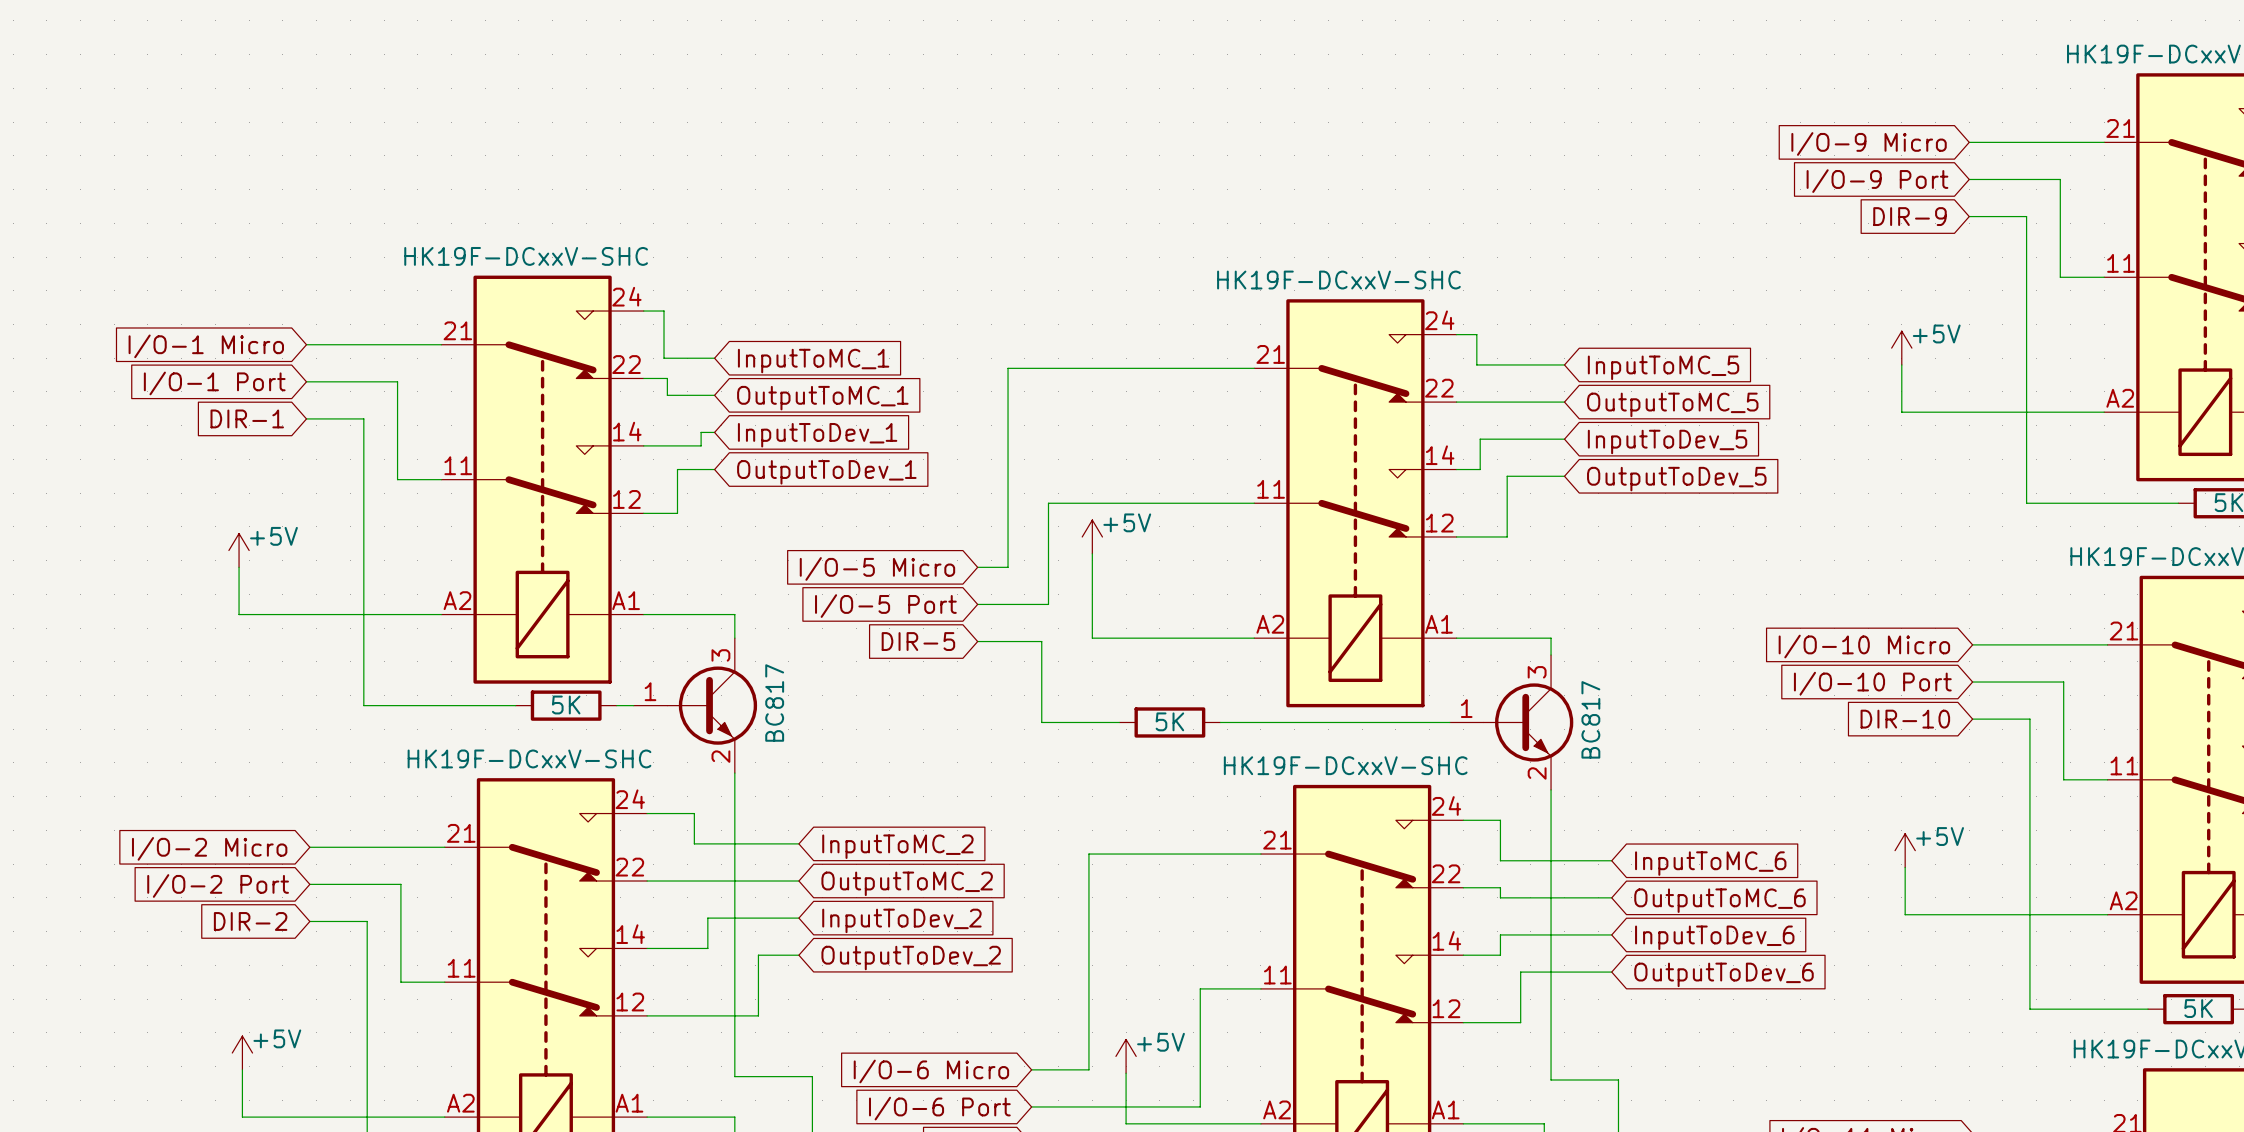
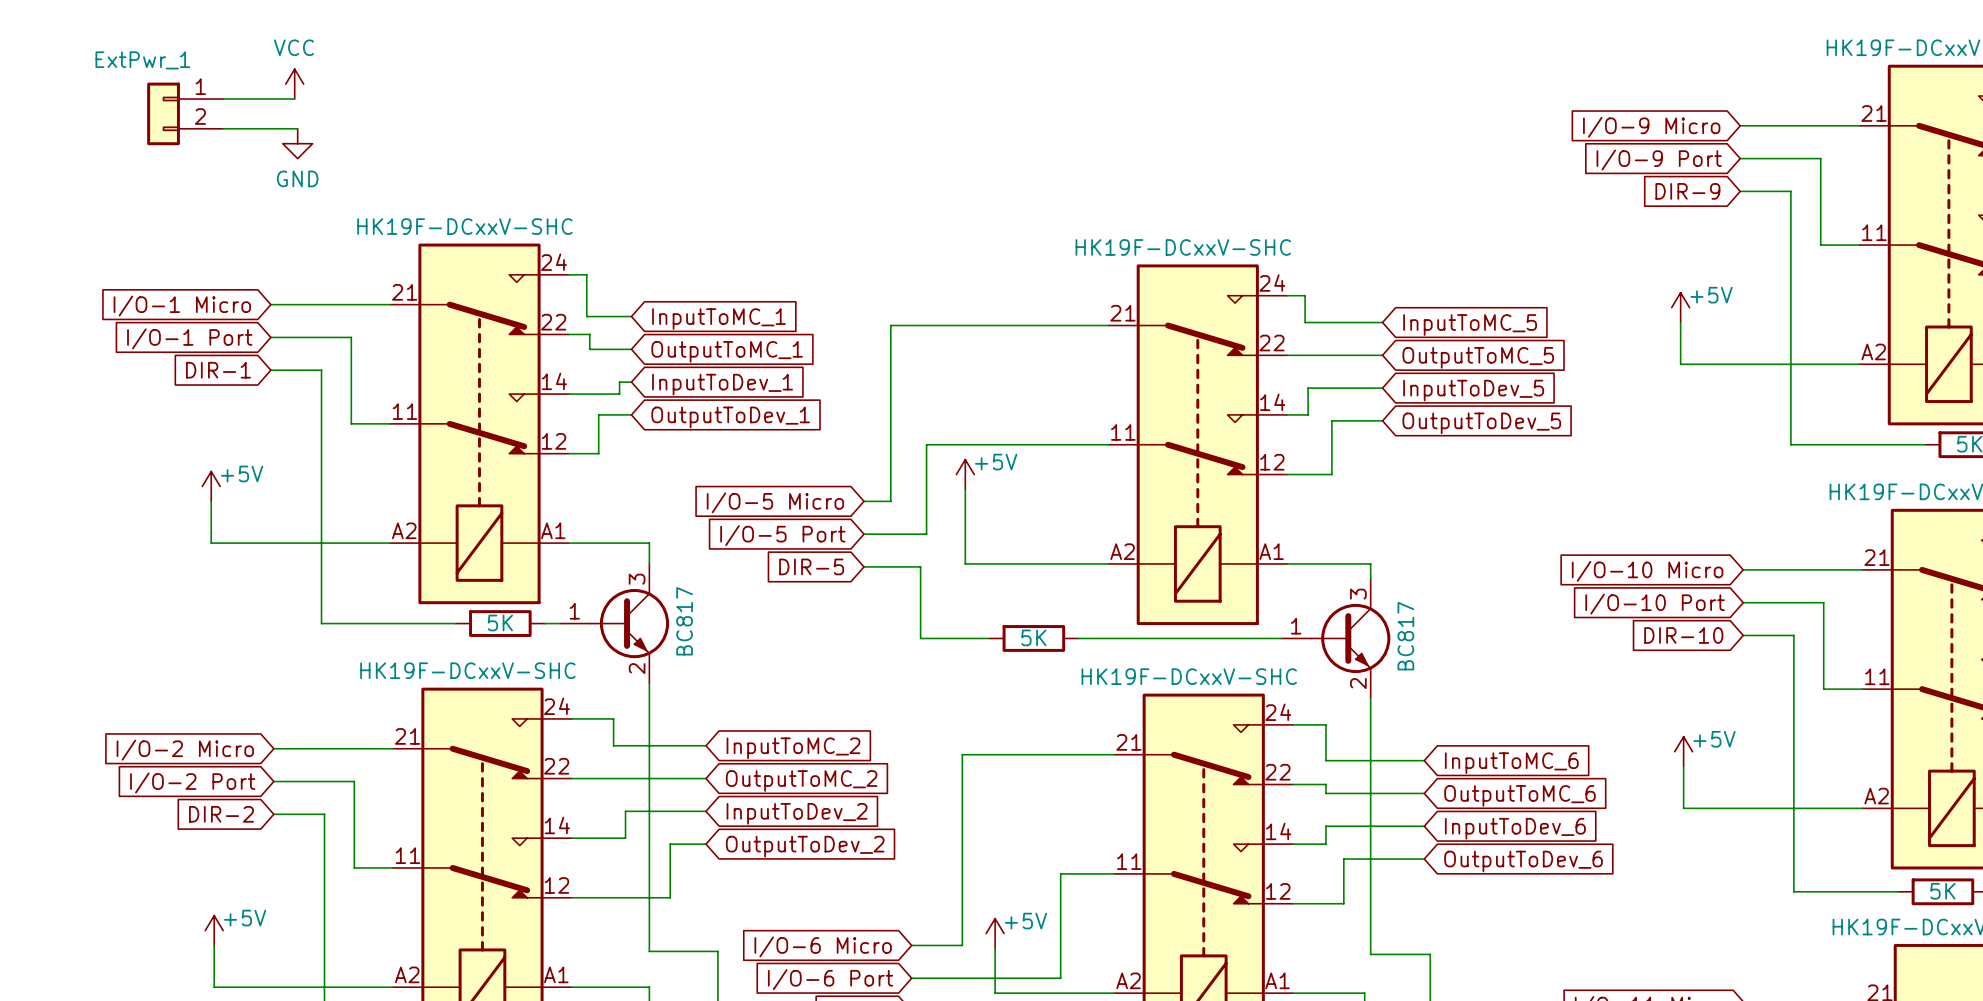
power symbol: none -> VCC (294, 84)
wire: none -> (223, 98) (294, 98)
ExtPwr_1: none -> (185, 113)
wire: none -> (223, 128) (297, 128)
power symbol: none -> GND (297, 143)

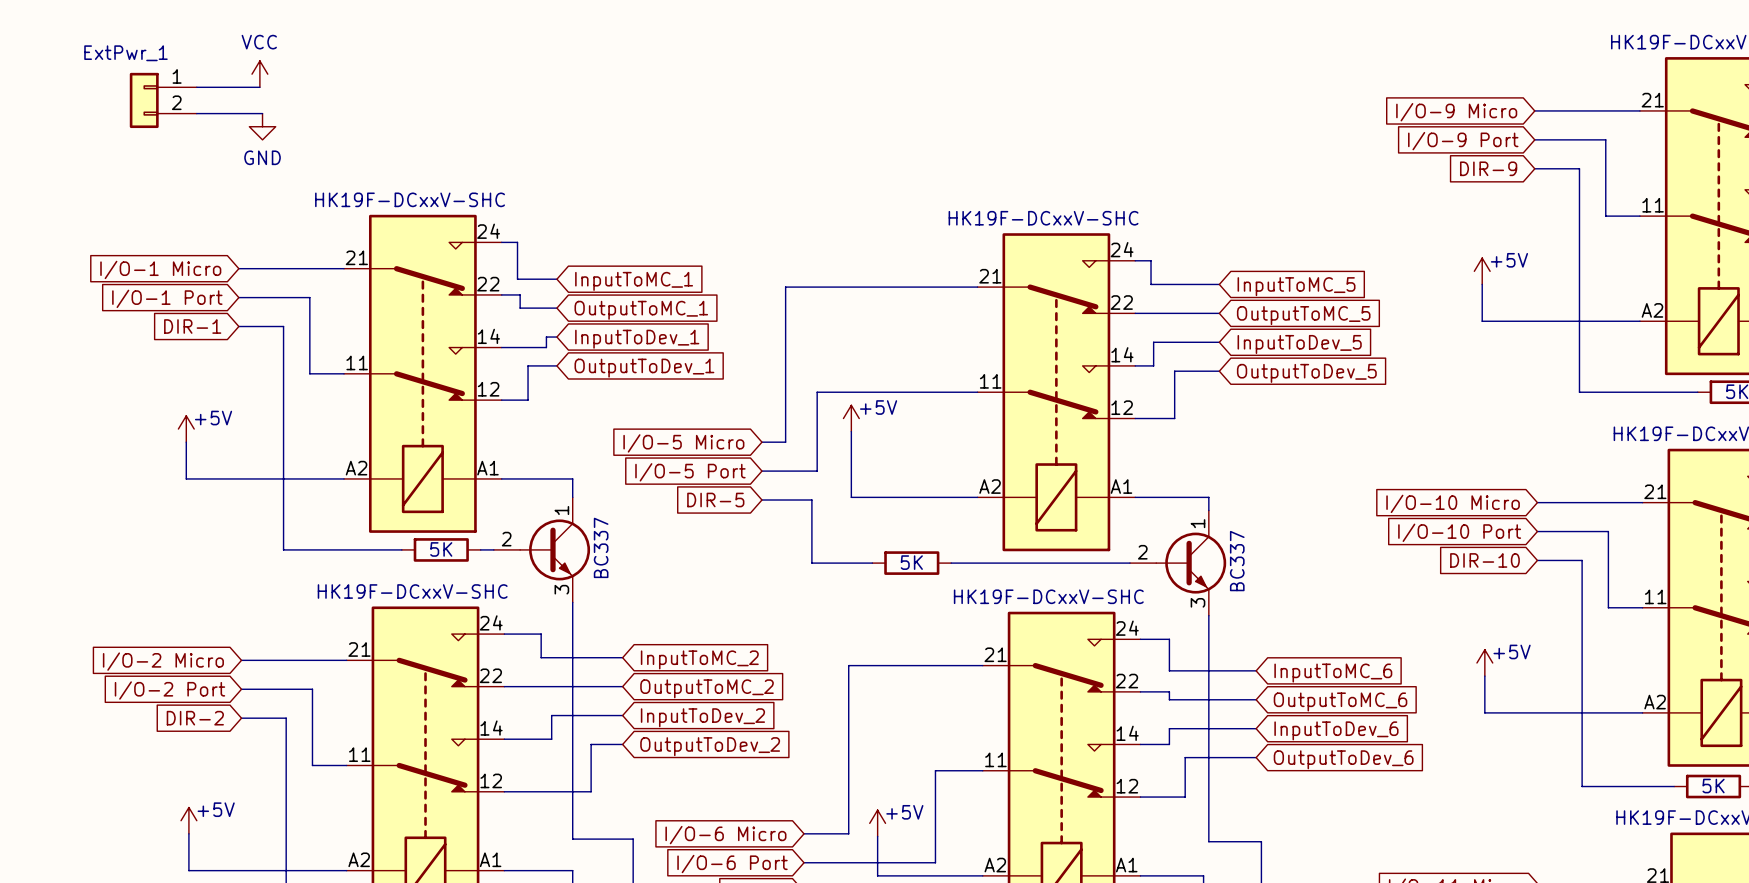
part pin number: 3 (637, 579) -> 1 (561, 510)
part pin number: 3 (1358, 594) -> 1 (1198, 523)
part pin number: 1 (574, 611) -> 2 (506, 539)
part value: BC817 (684, 621) -> BC337 (601, 547)
part pin number: 1 (1296, 626) -> 2 (1142, 552)
part value: BC817 (1405, 636) -> BC337 (1237, 561)
part pin number: 2 (637, 668) -> 3 (561, 589)
part pin number: 2 (1358, 683) -> 3 (1198, 602)

